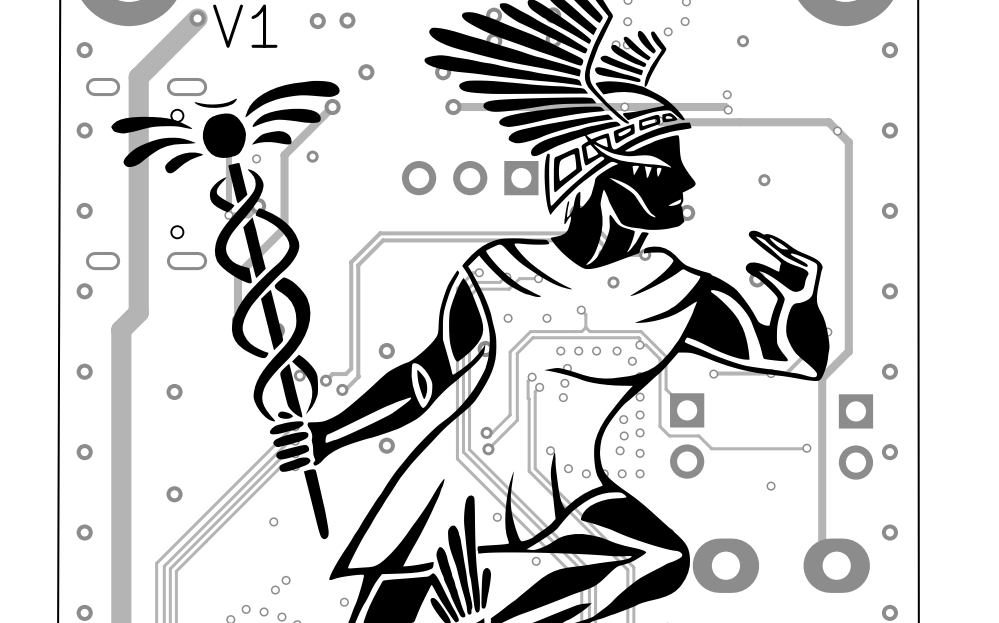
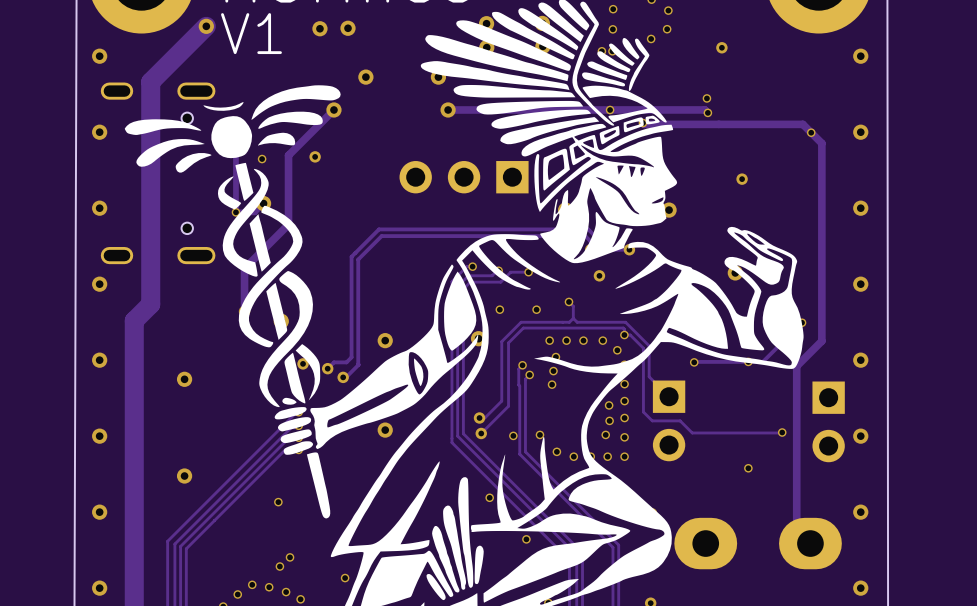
via: none -> (513, 435)

